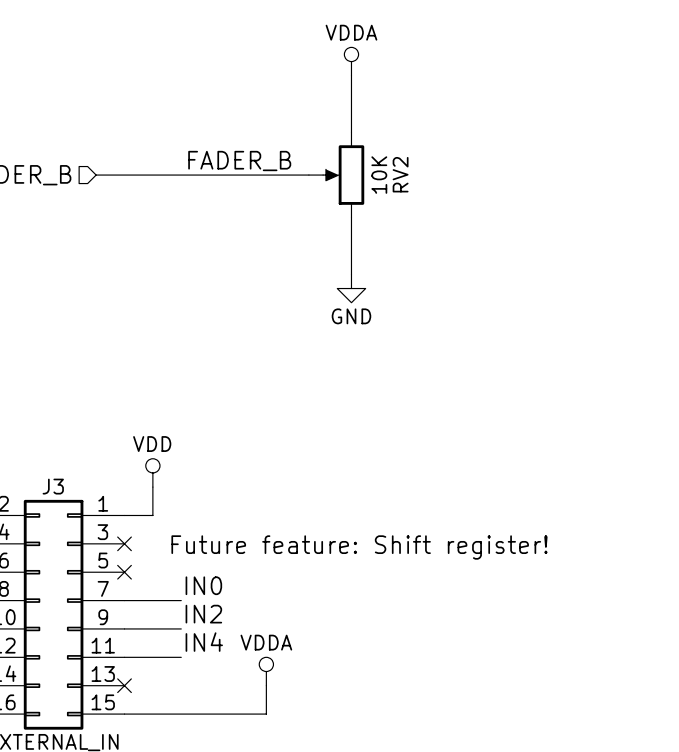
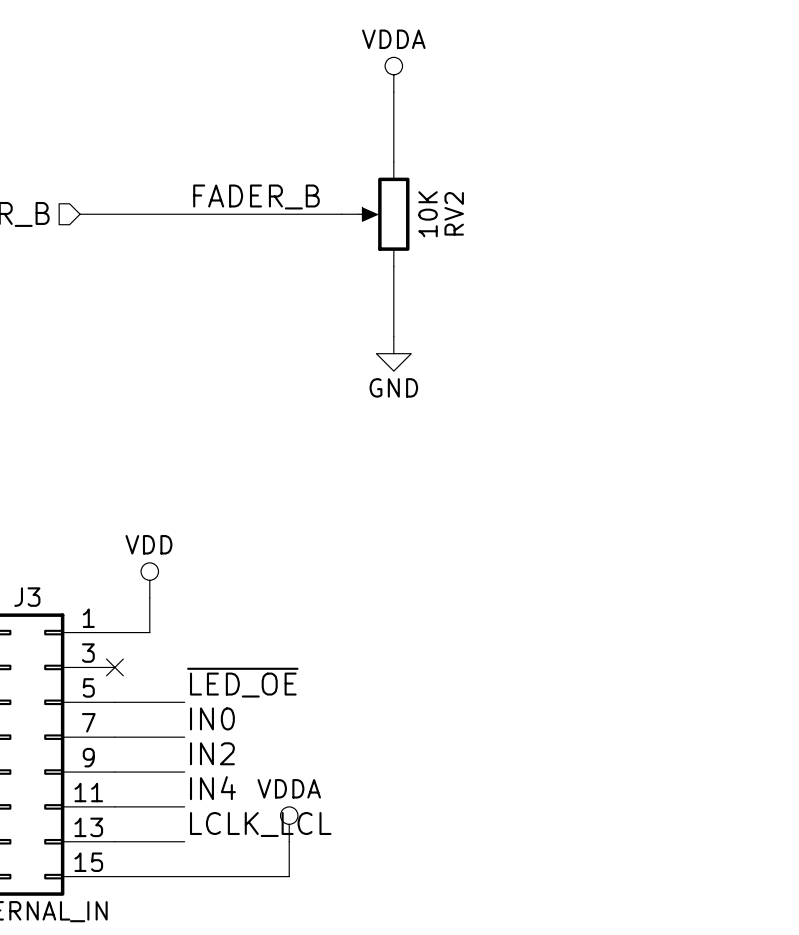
text: Future feature: Shift register! (359, 547) -> none
label: none -> ~{LED_OE} (242, 682)
wire: none -> (114, 702) (184, 702)
no-connect mark: (124, 572) -> none
label: none -> LCLK_LCL (260, 824)
wire: none -> (114, 841) (184, 841)
no-connect mark: (124, 685) -> none

